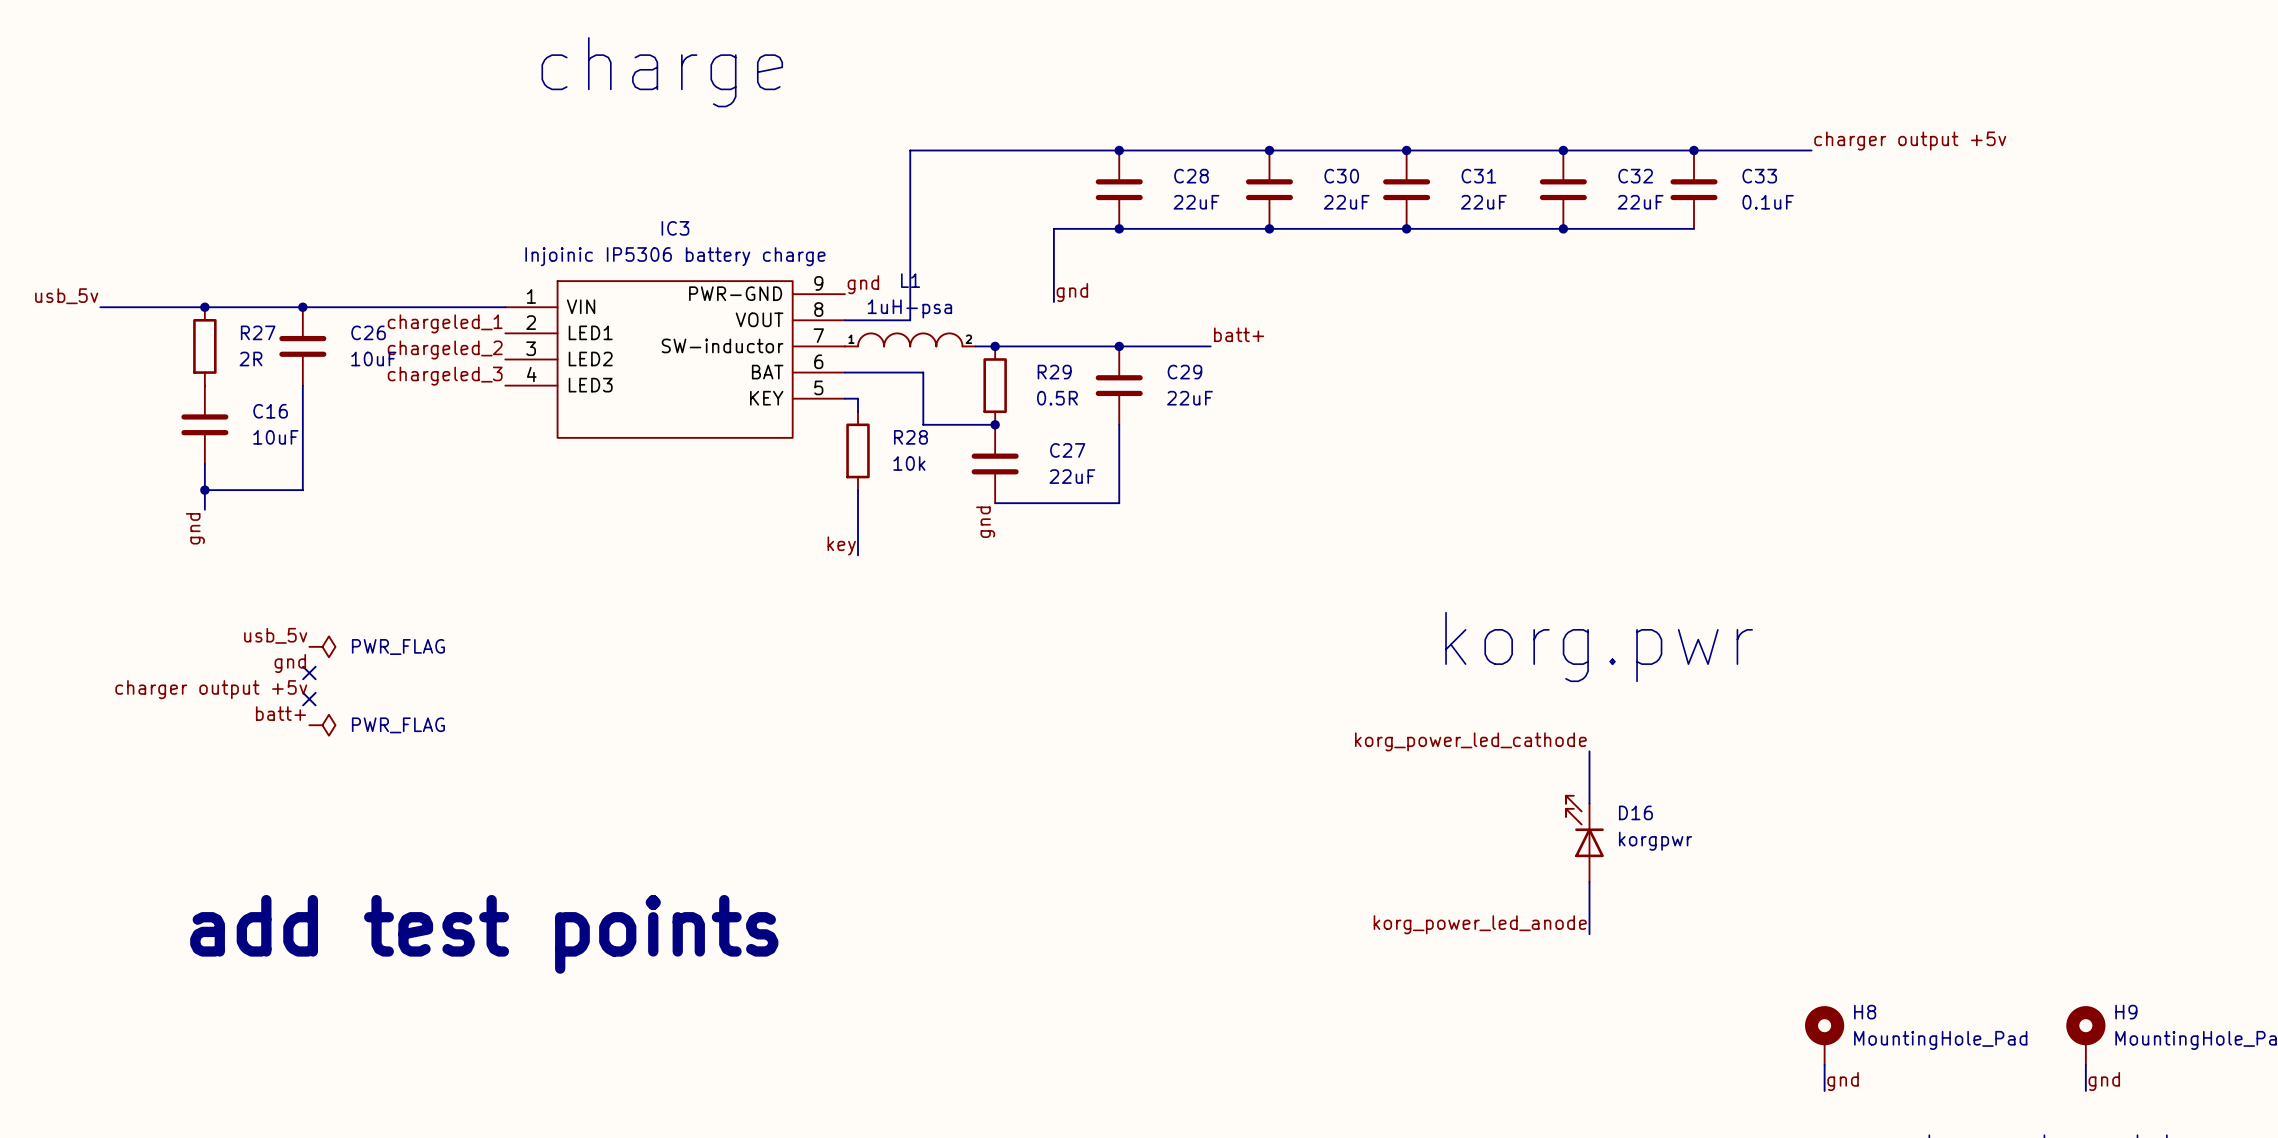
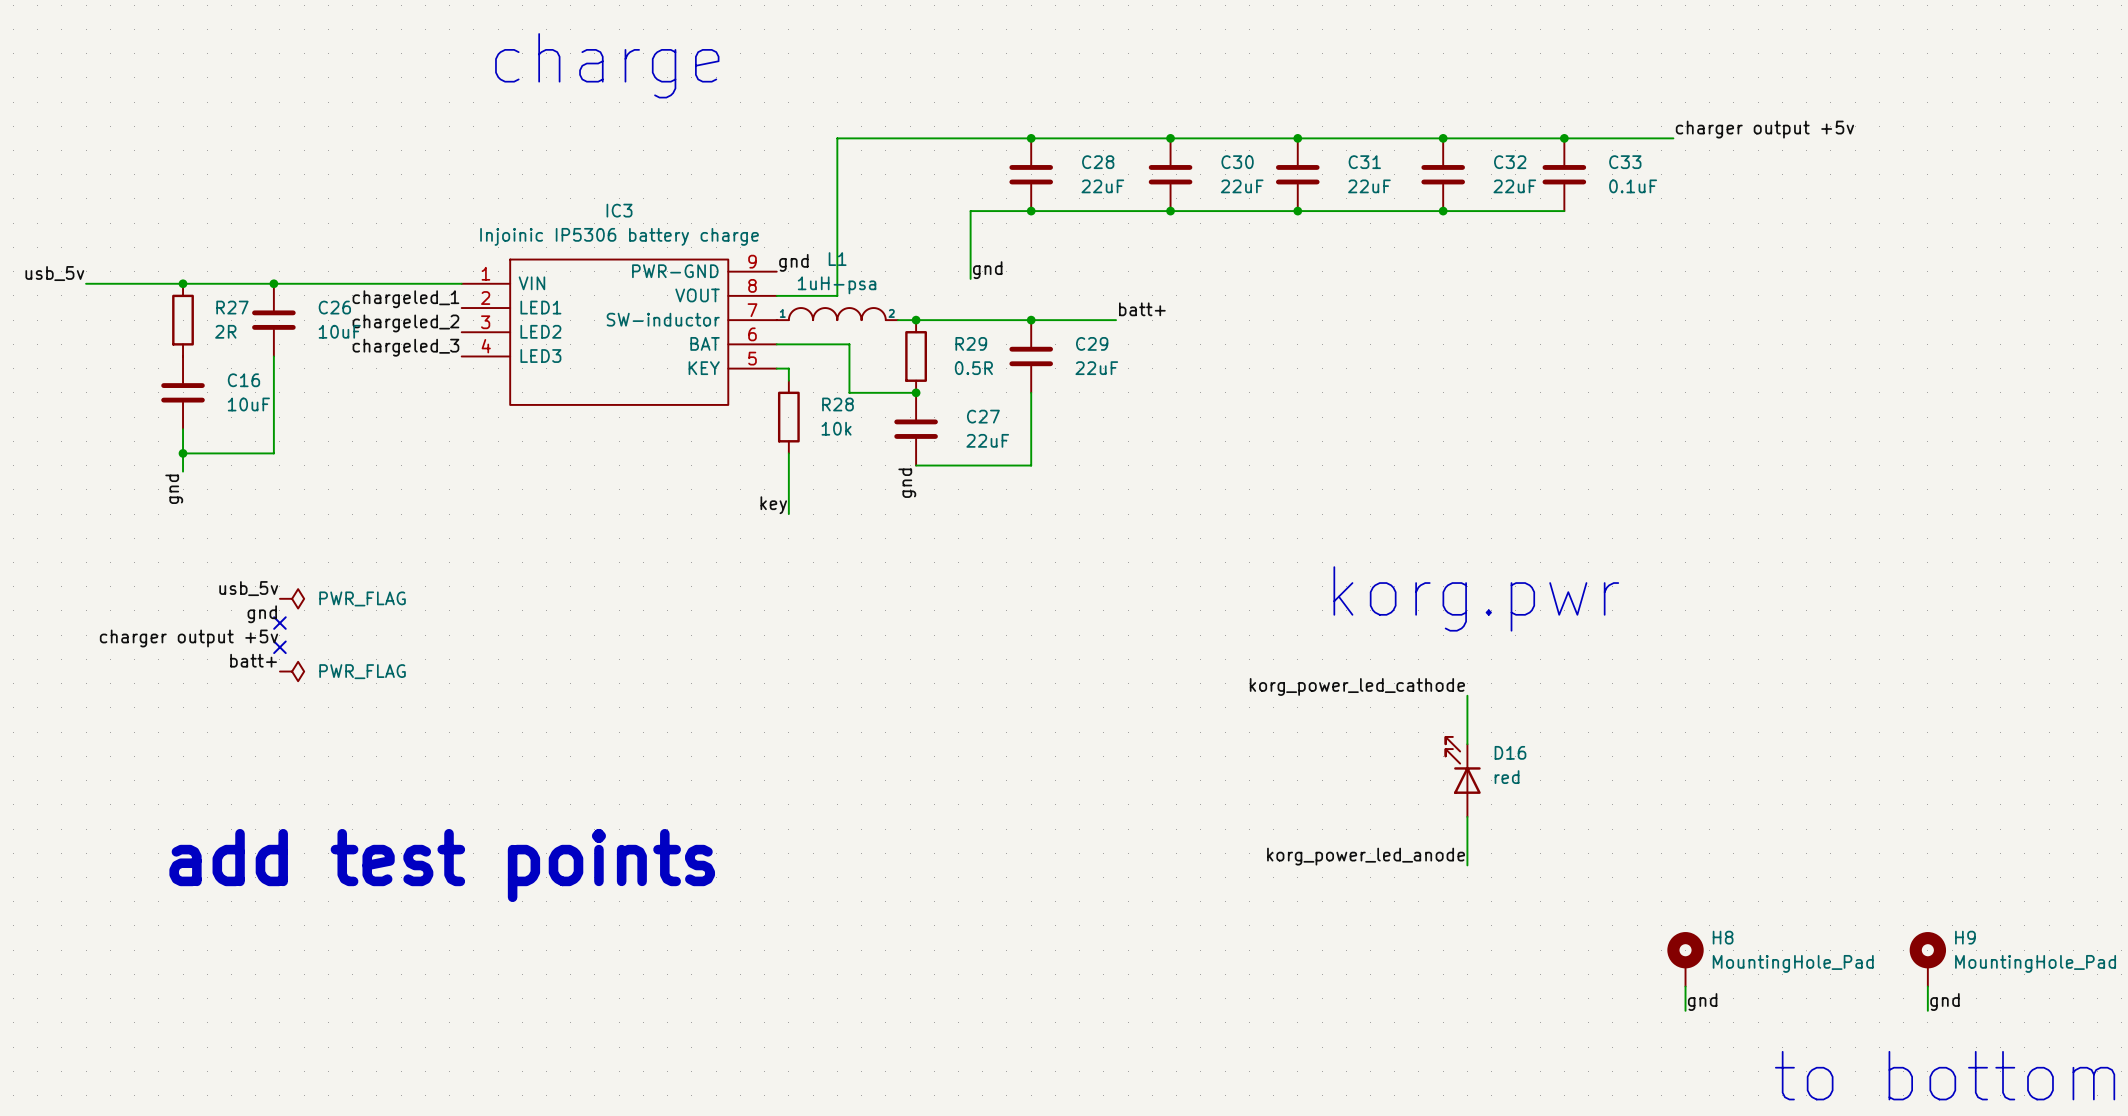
D16 value: korgpwr (1655, 841) -> red (1507, 777)

